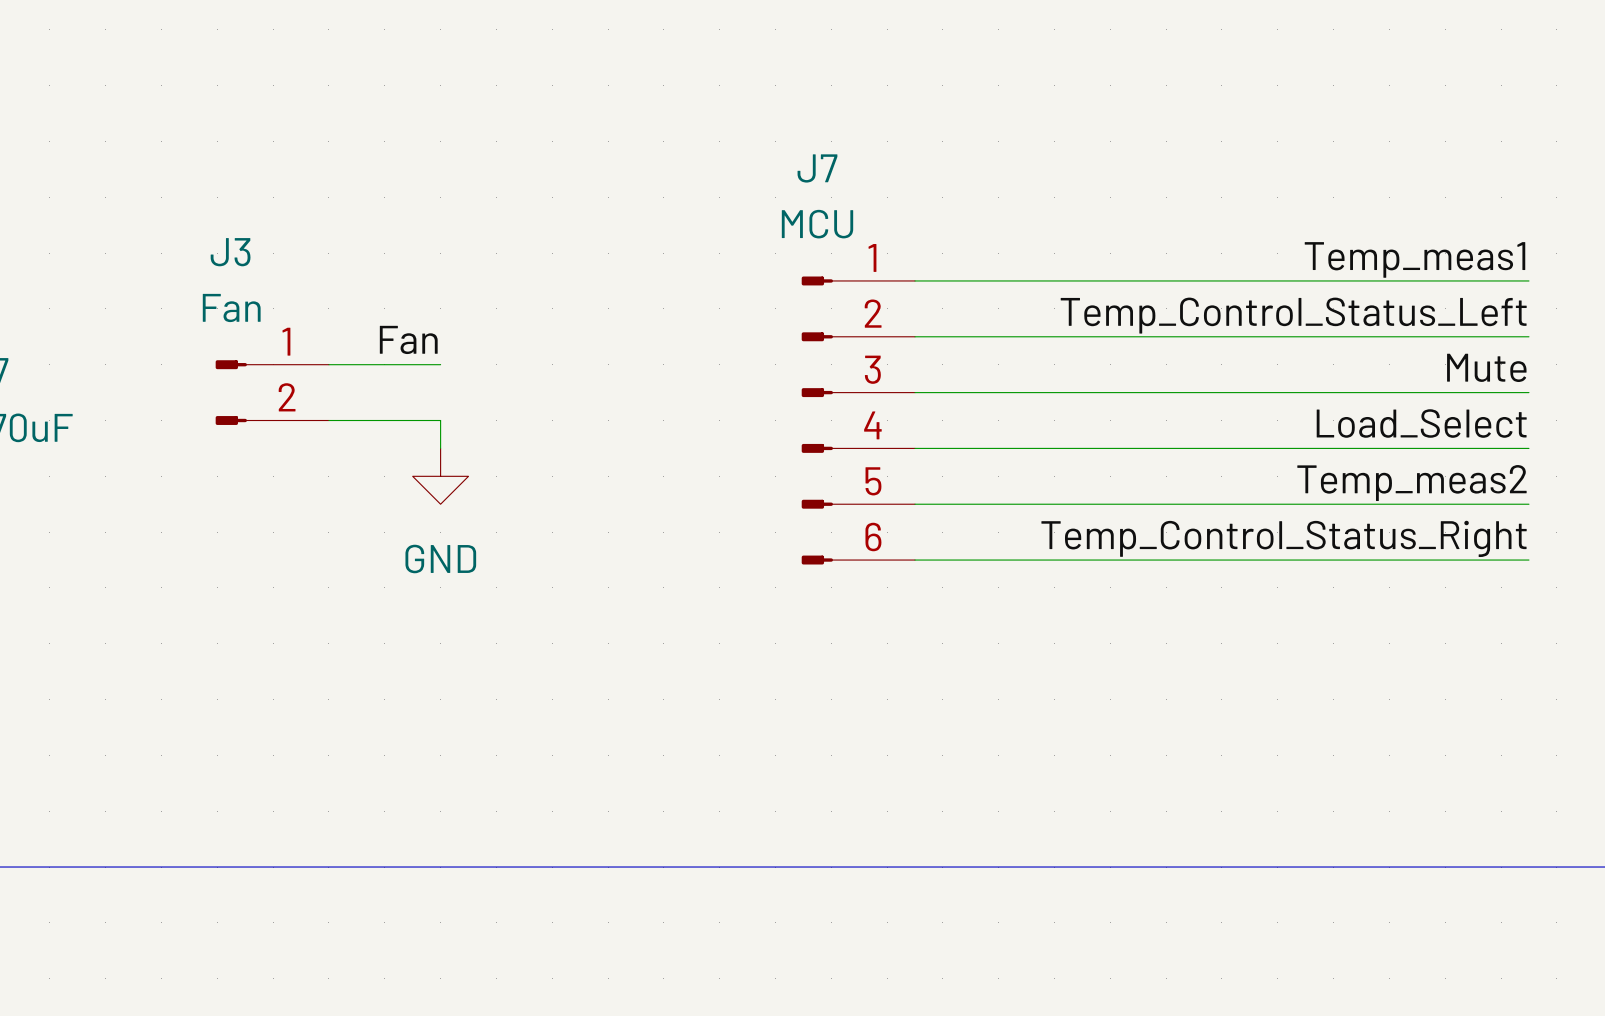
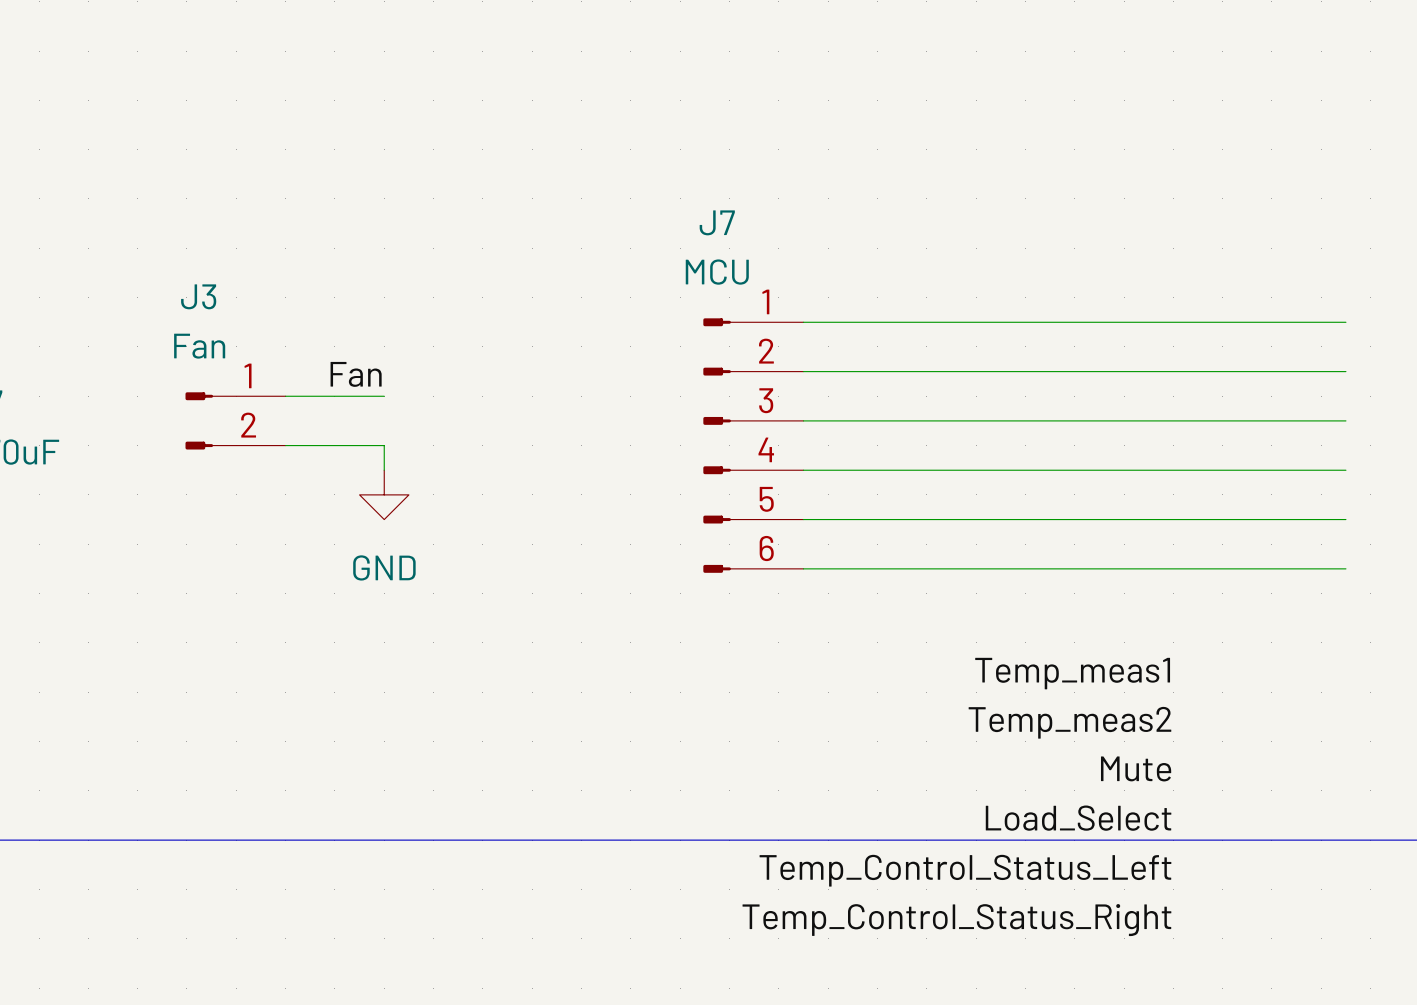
label position: Temp_meas1 (1414, 259) -> Temp_meas1 (1072, 673)
label: Temp_Control_Status_Left (1293, 315) -> none
label position: Mute (1486, 367) -> Mute (1136, 768)
label position: Load_Select (1421, 423) -> Load_Select (1078, 818)
label position: Temp_meas2 (1411, 483) -> Temp_meas2 (1069, 722)
label position: Temp_Control_Status_Right (1284, 538) -> Temp_Control_Status_Right (956, 920)
label: none -> Temp_Control_Status_Left (965, 870)

